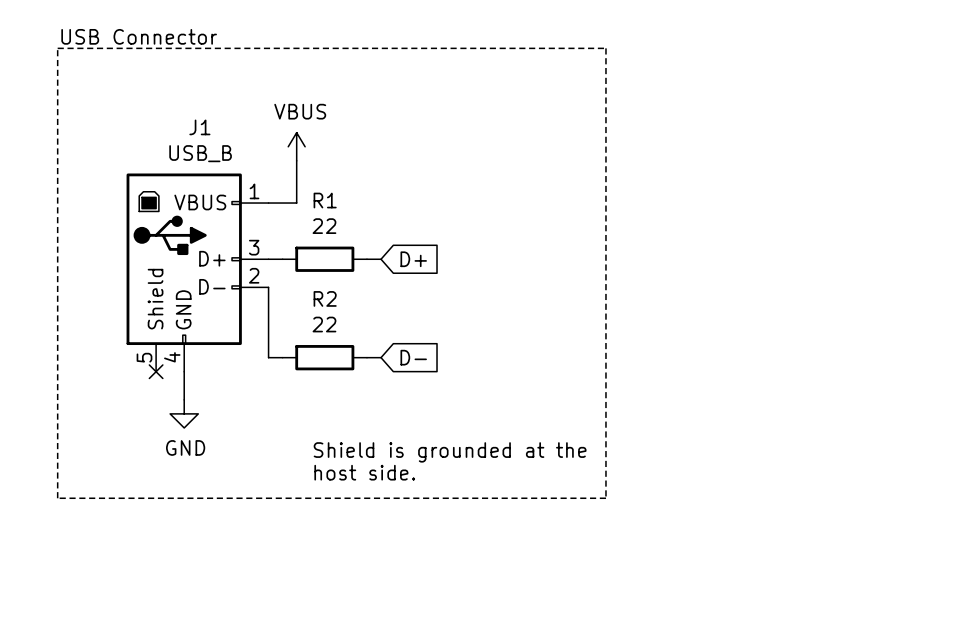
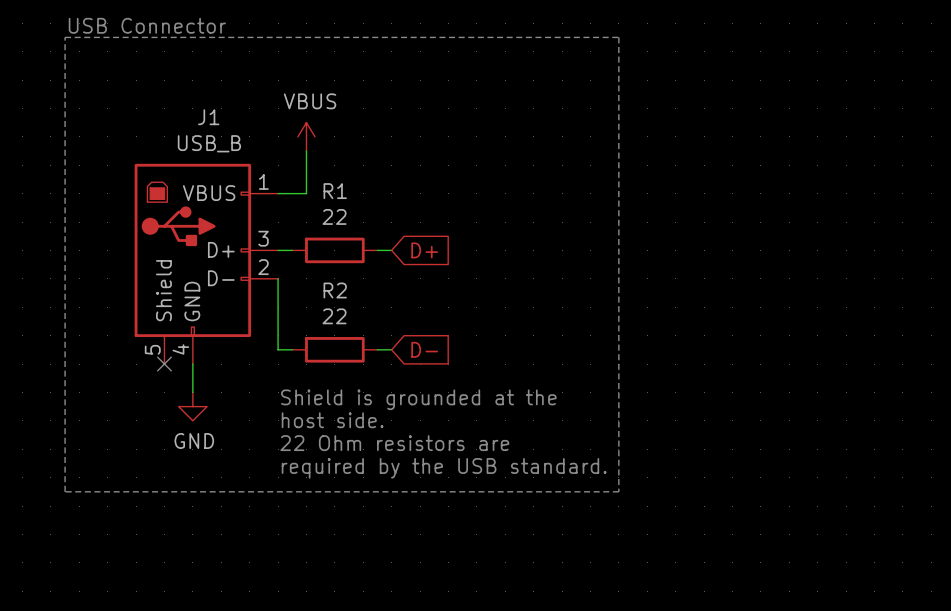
text: none -> 22 Ohm resistors are (394, 443)
text position: Shield is grounded at the (450, 452) -> Shield is grounded at the (418, 399)
text position: host side. (364, 472) -> host side. (332, 420)
text: none -> required by the USB standard. (444, 468)

